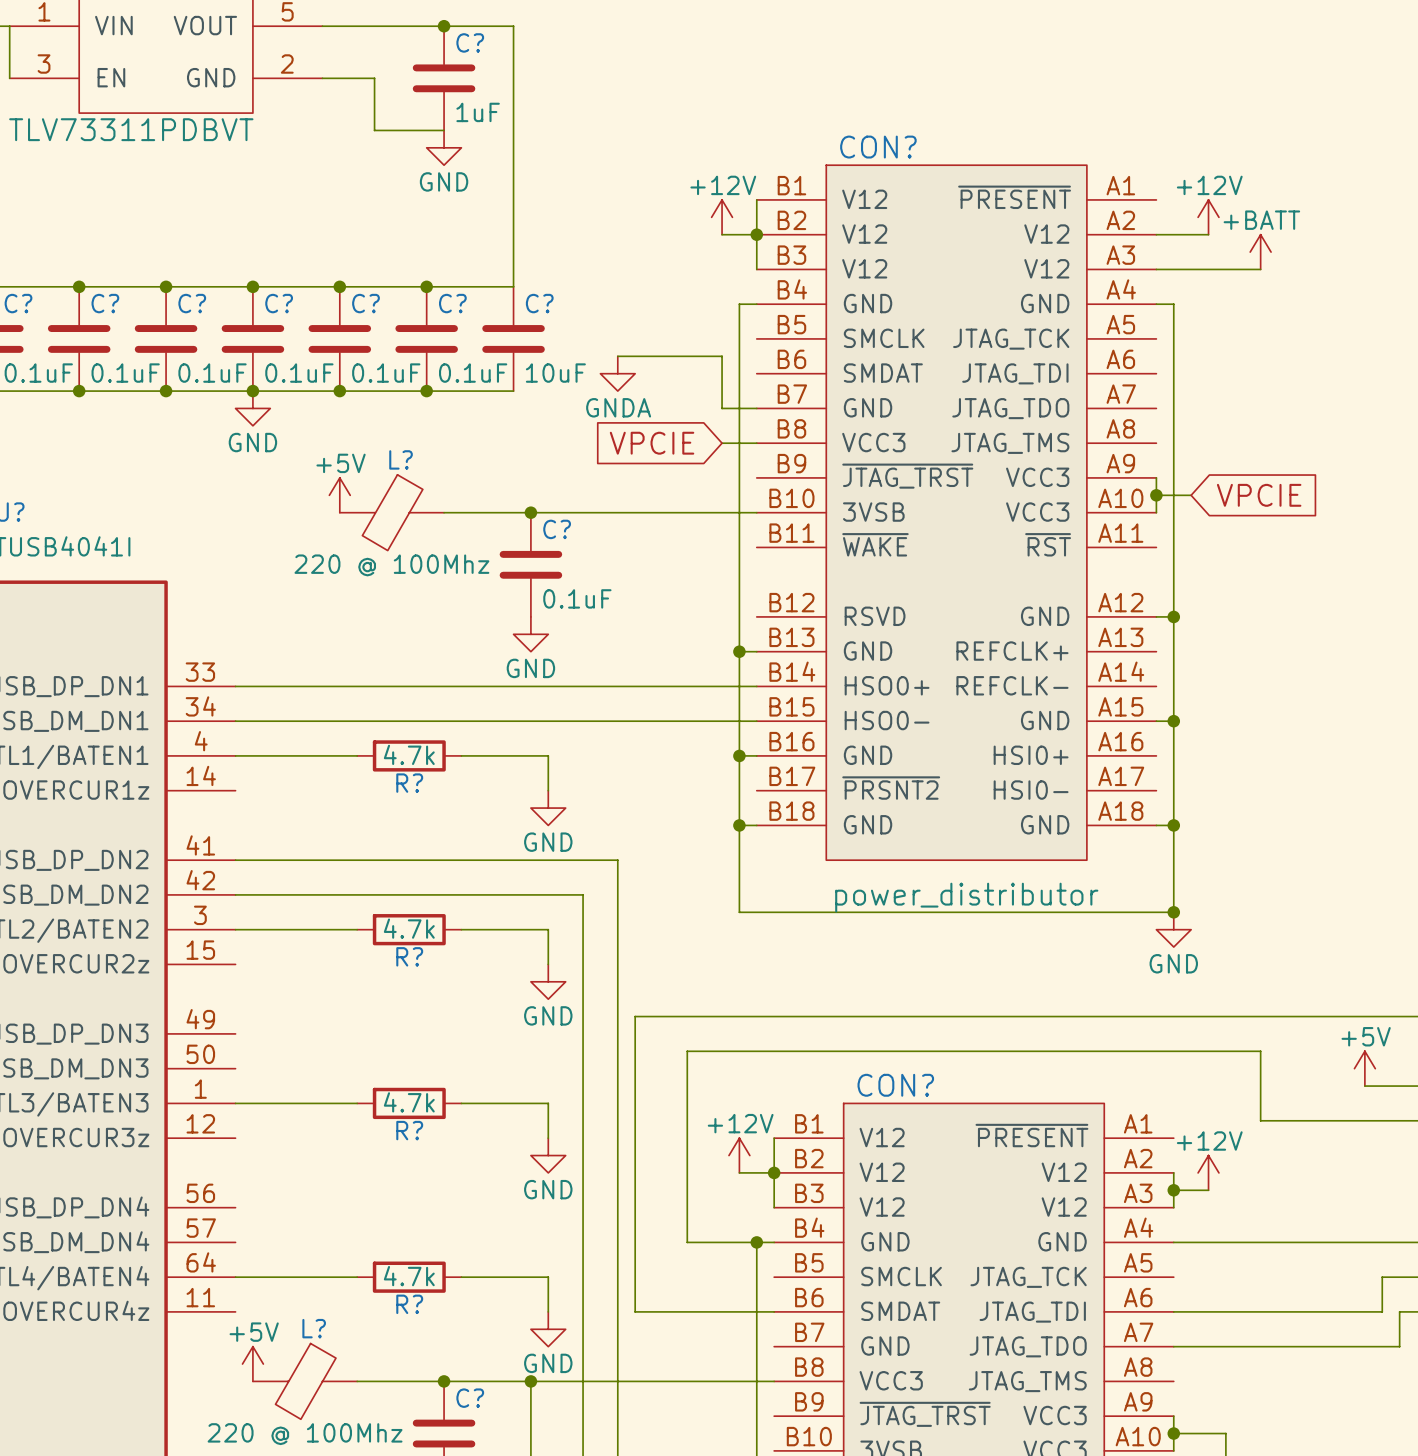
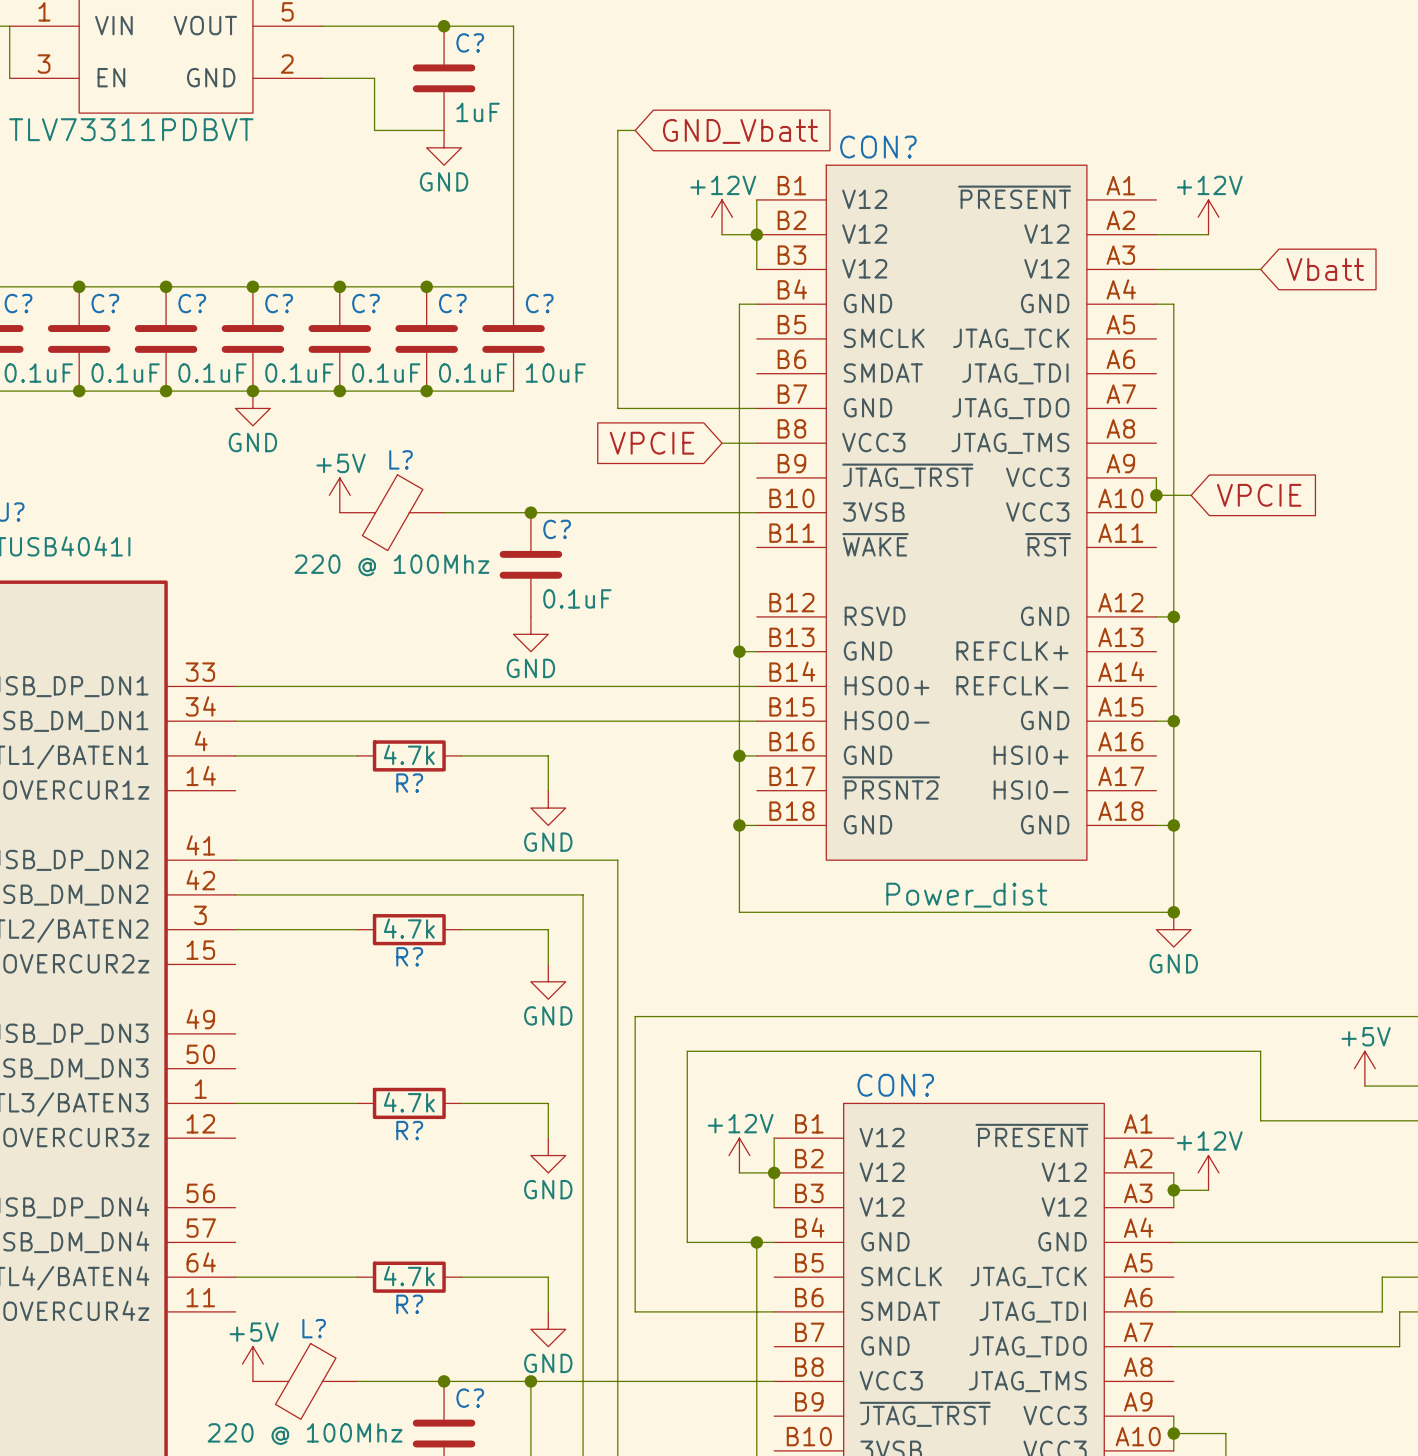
global label: none -> GND_Vbatt (740, 131)
power symbol: +BATT (1260, 252) -> none
global label: none -> Vbatt (1325, 269)
wire: (617, 356) (722, 356) (722, 408) -> (635, 130) (617, 130) (617, 408) (722, 408)
power symbol: GNDA (617, 373) -> none
CON? value: power_distributor (966, 897) -> Power_dist (966, 895)

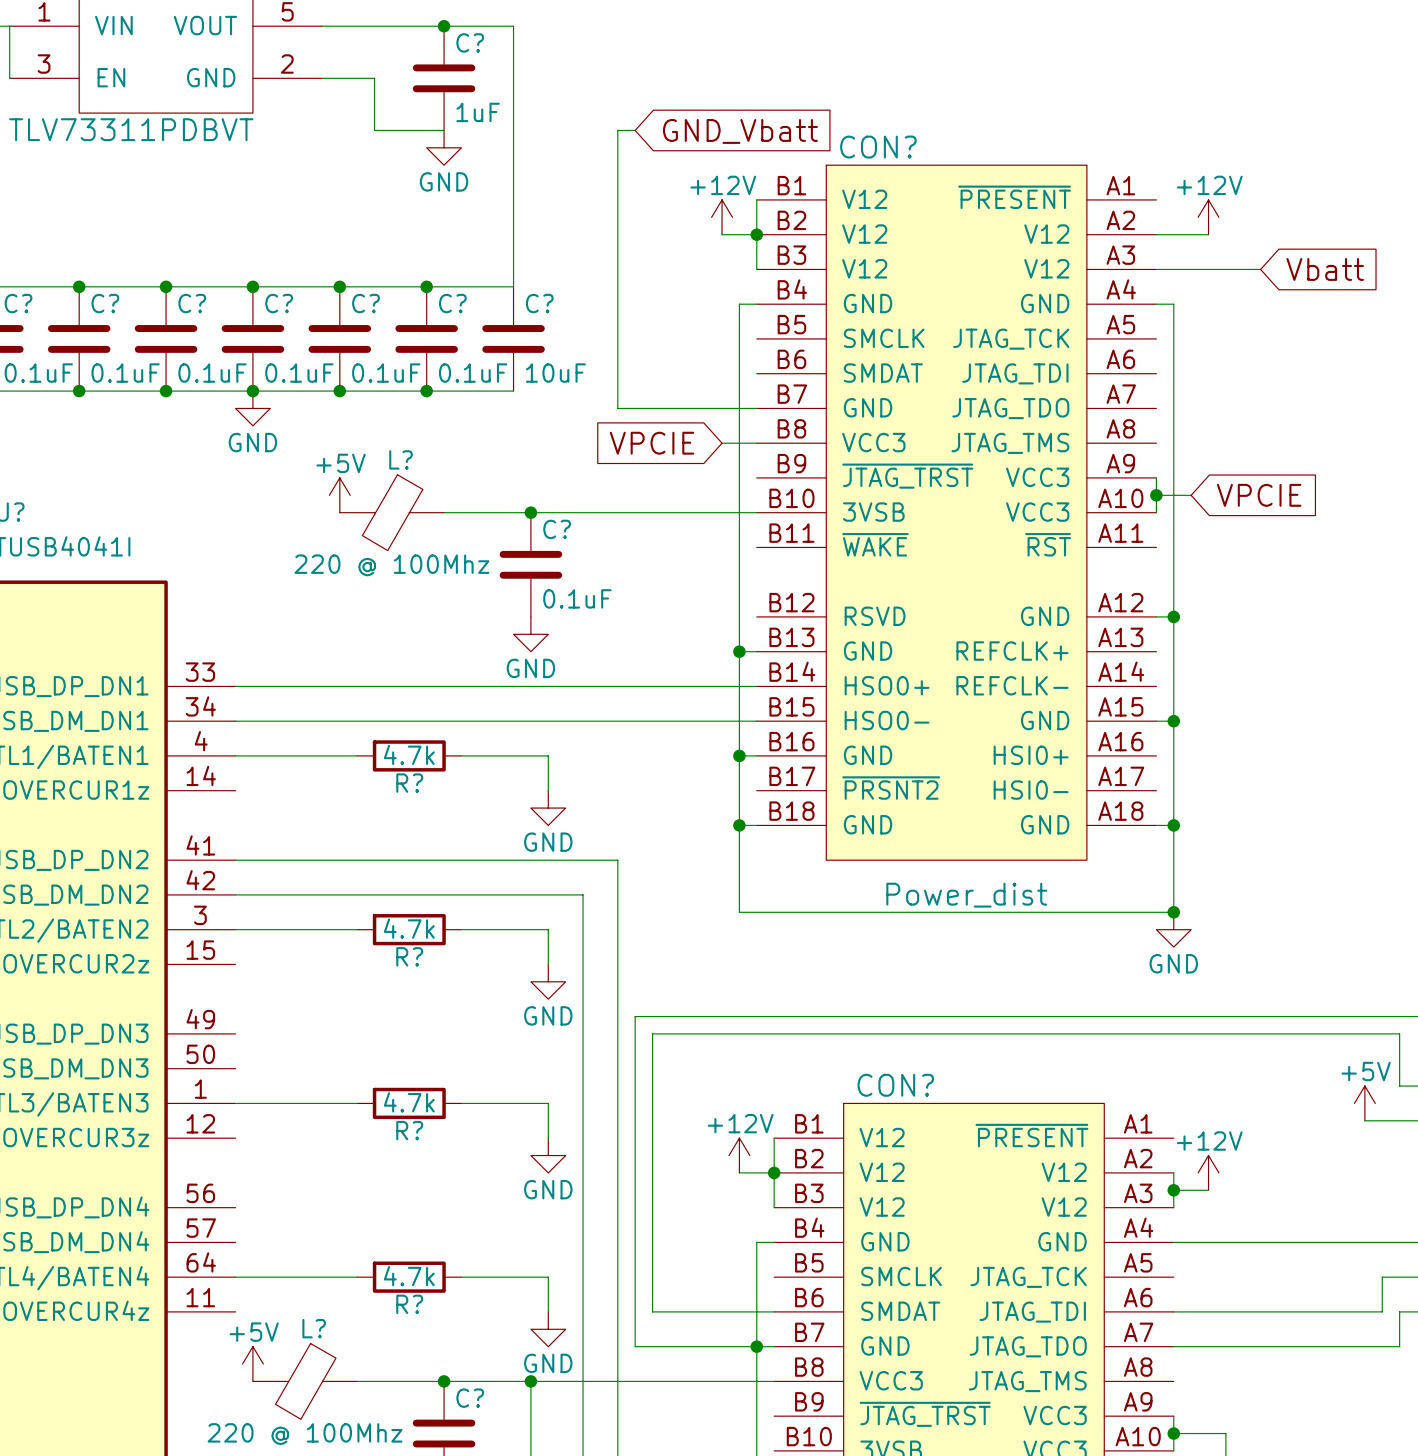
power symbol position: +5V (1364, 1068) -> +5V (1364, 1103)
wire: (1364, 1086) (1399, 1086) -> (652, 1311) (652, 1033) (1399, 1033) (1399, 1086)
wire: (1364, 1120) (1260, 1120) (1260, 1051) (687, 1051) (687, 1242) (756, 1242) -> none
junction: (756, 1242) -> none
wire: (635, 1311) (652, 1311) -> (635, 1311) (635, 1346) (774, 1346)
junction: none -> (756, 1346)

